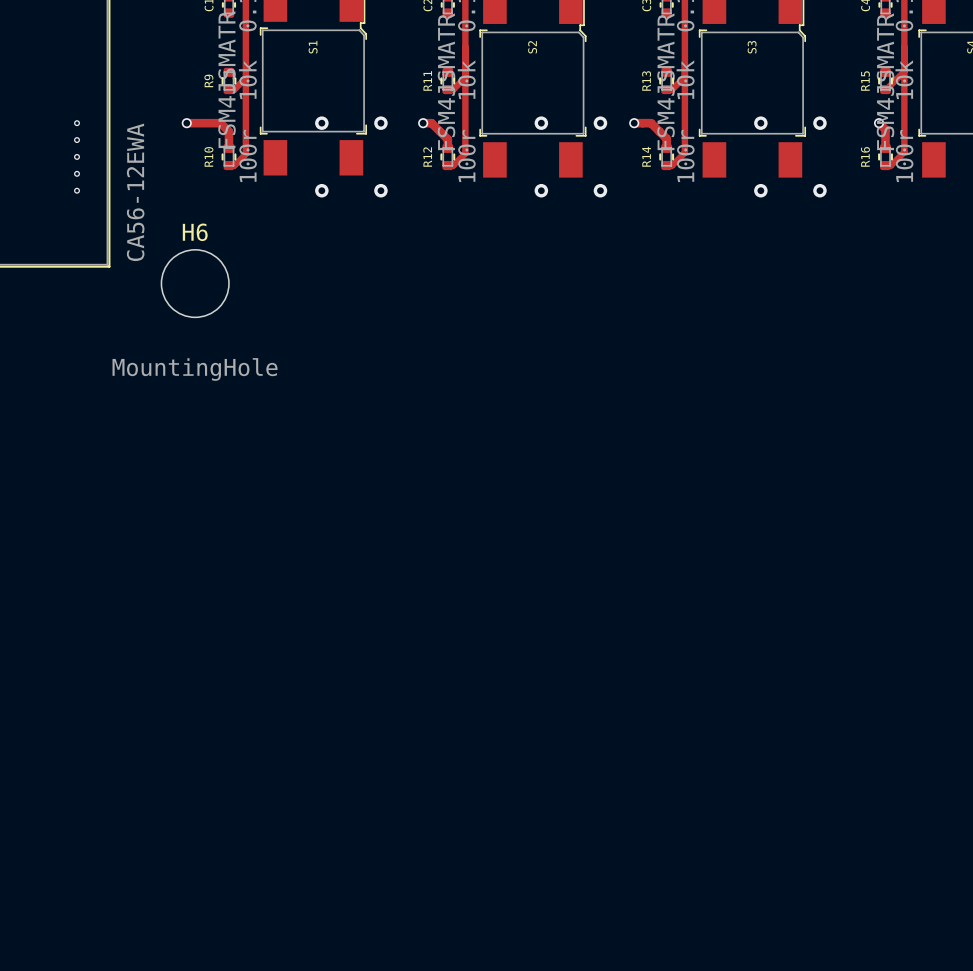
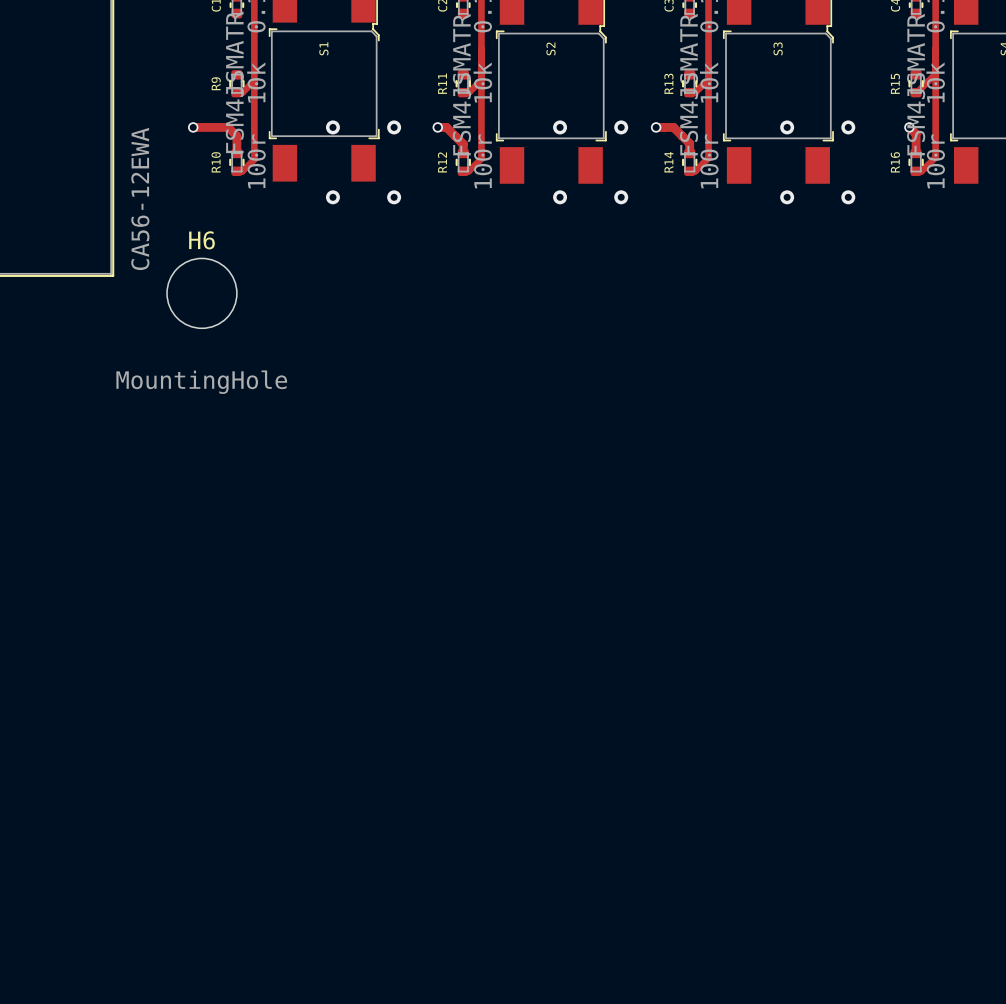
via: (77, 123) -> none
via: (77, 140) -> none
via: (77, 156) -> none
via: (77, 173) -> none
via: (77, 190) -> none

